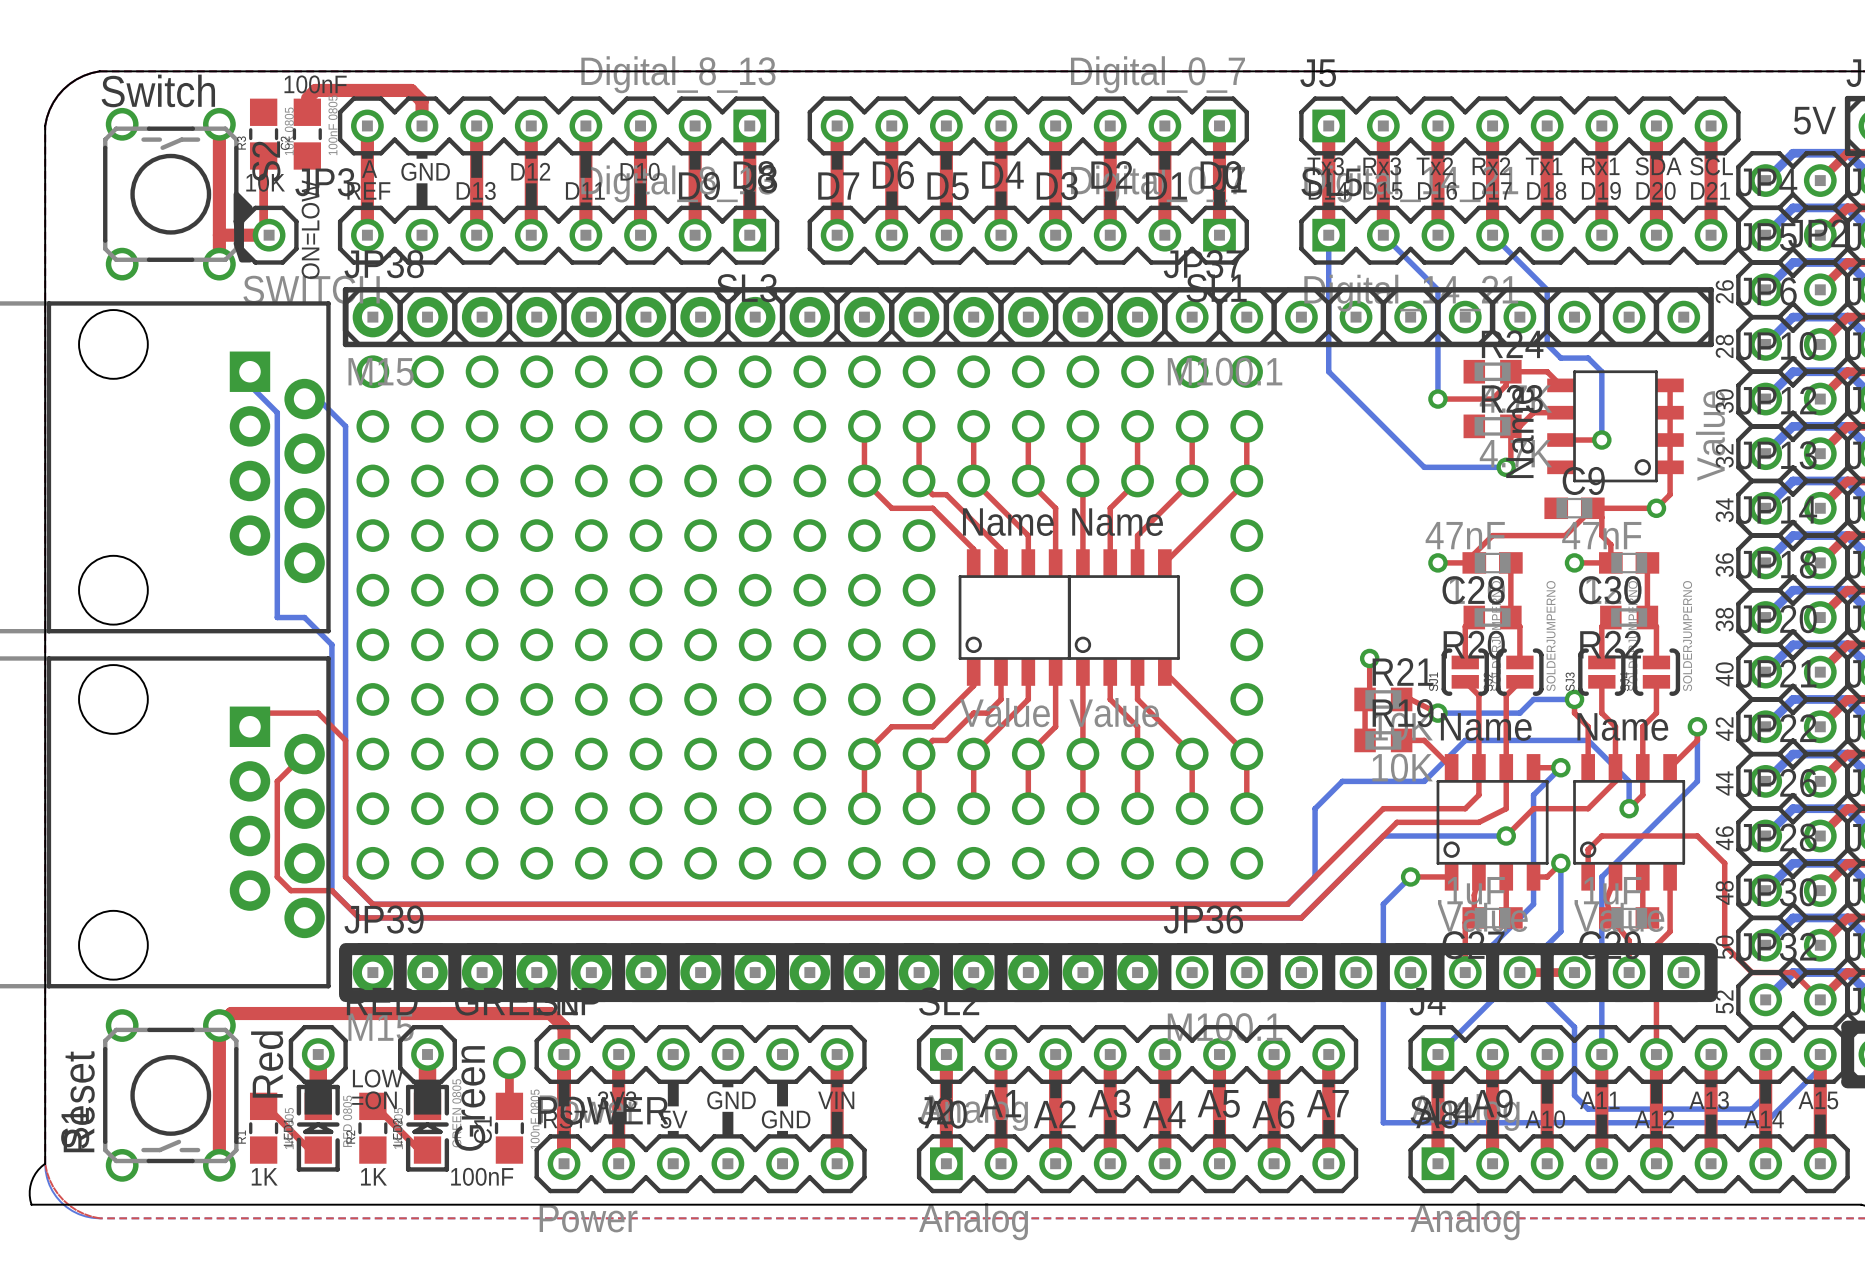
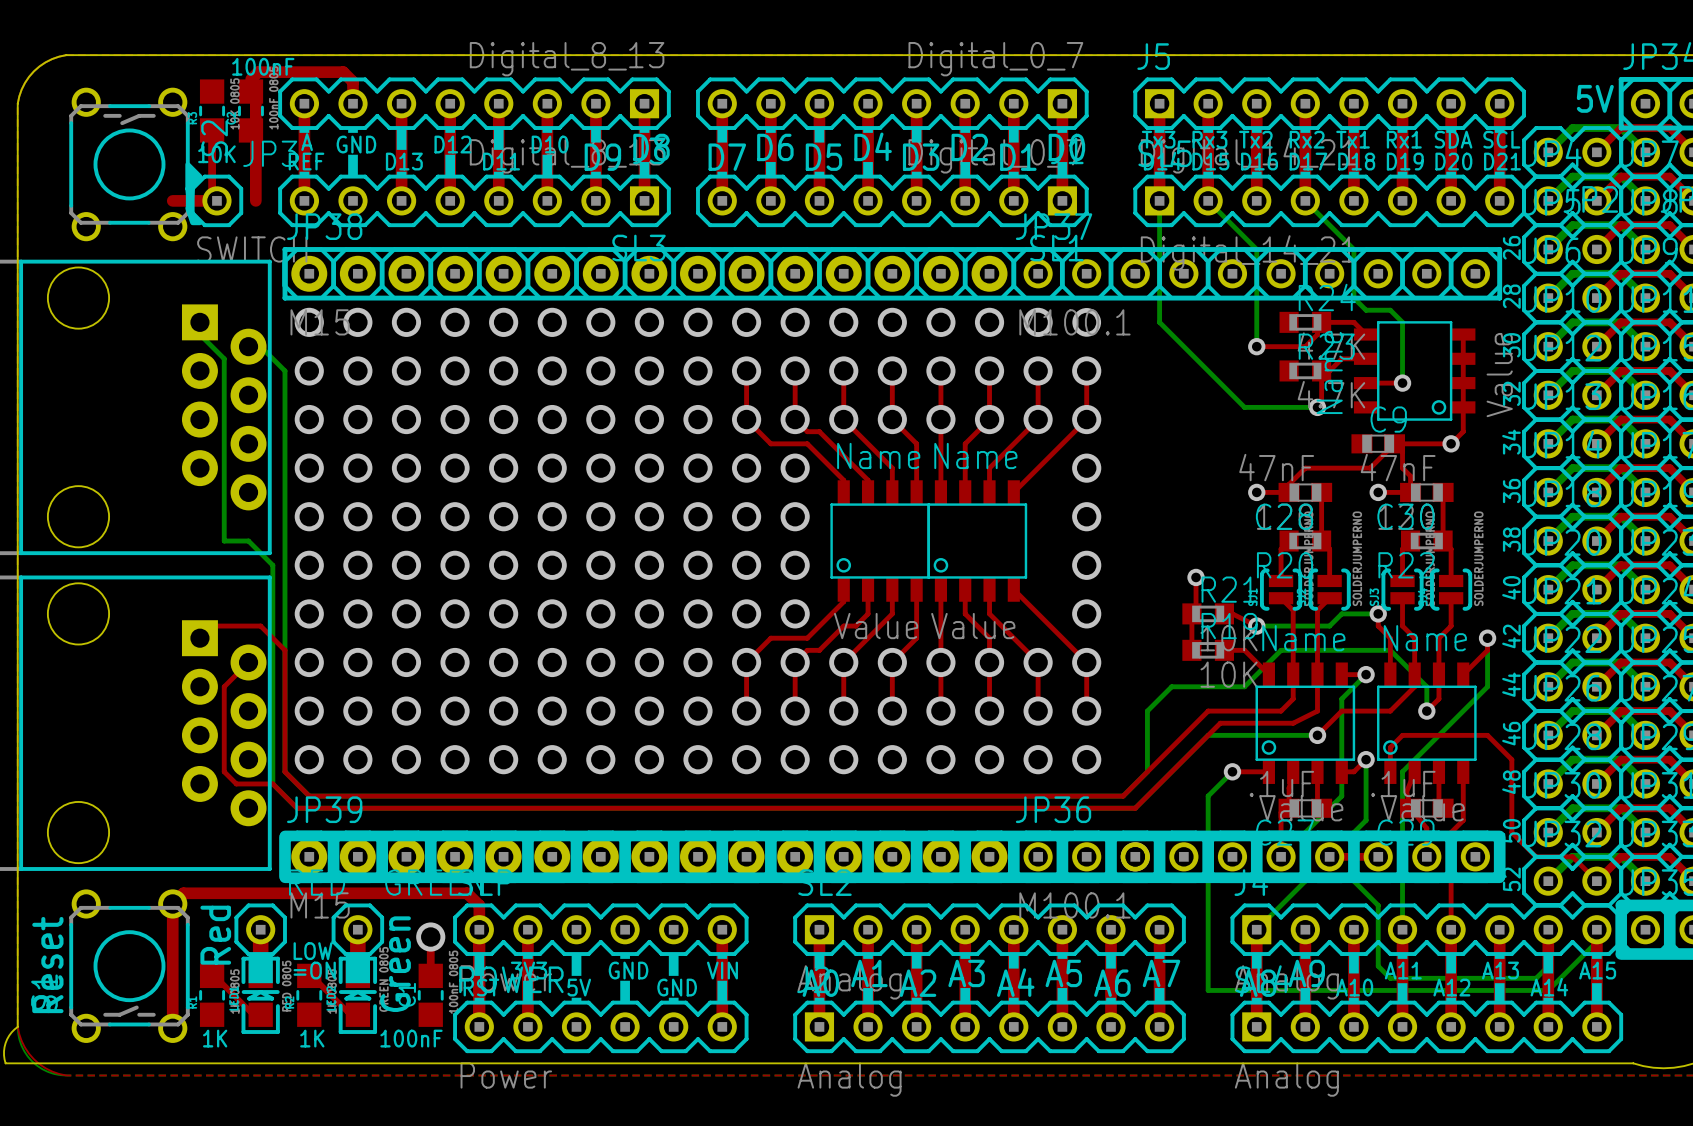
text: Switch (158, 90) -> none
top track: (219, 124) (219, 264) -> none
top track: none -> (255, 103) (255, 200)
text: ON=LOW (310, 229) -> none

